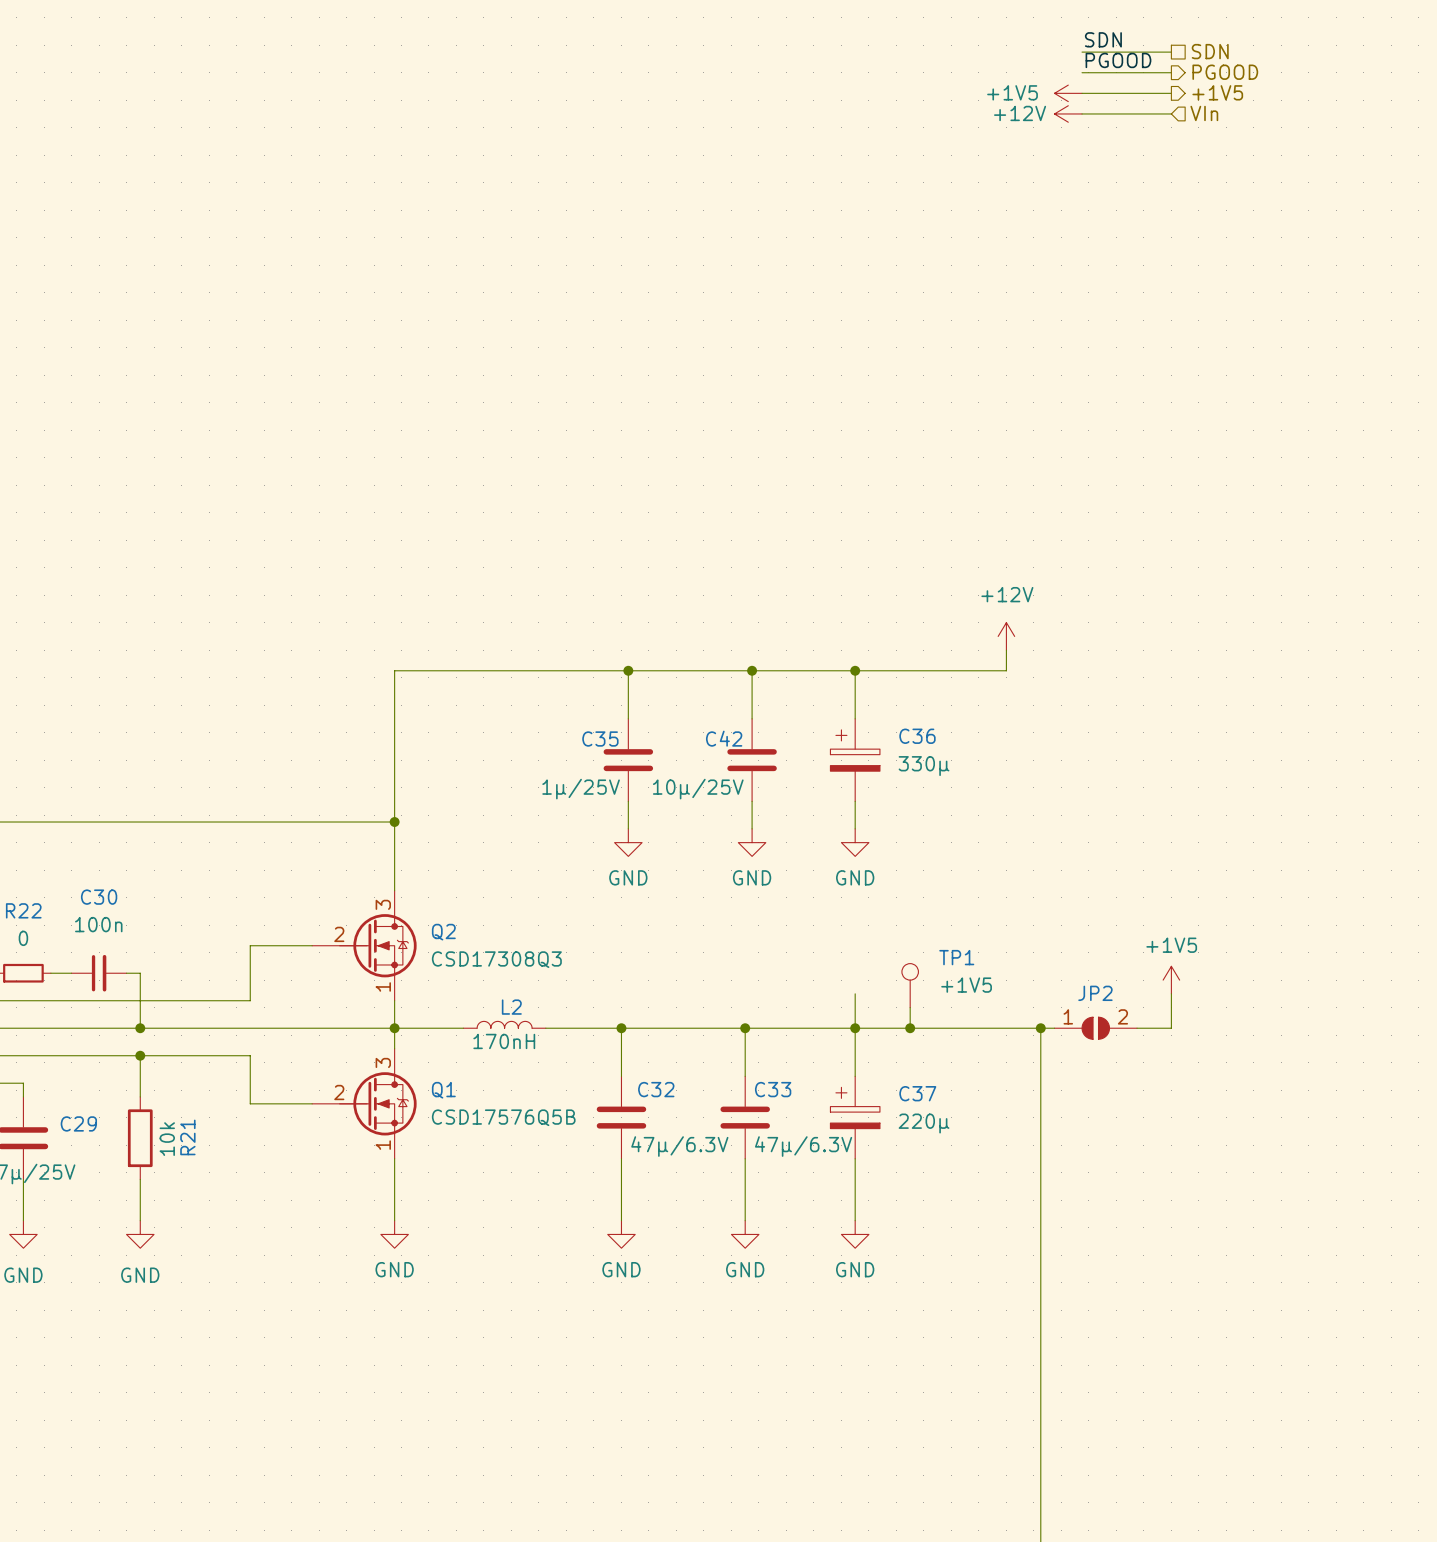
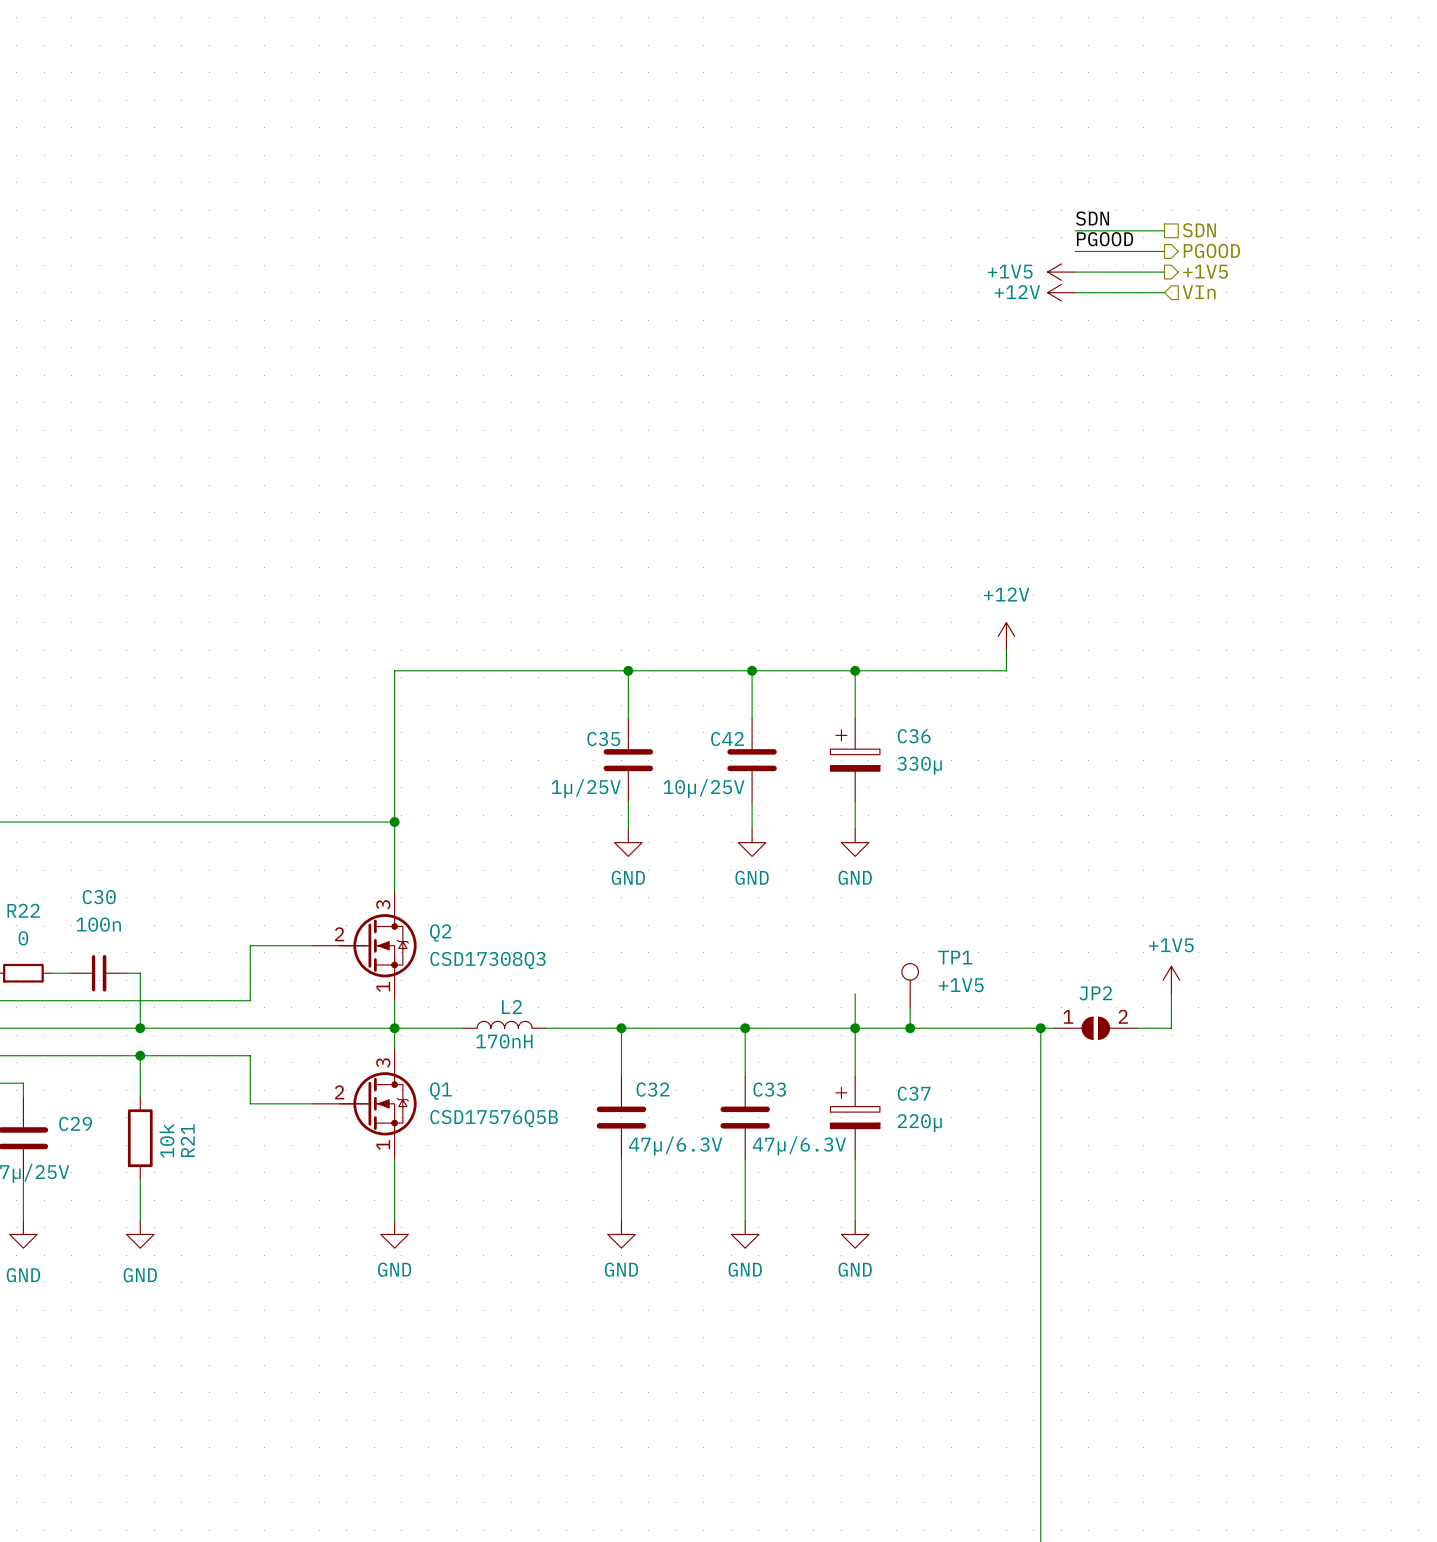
label position: SDN (1103, 39) -> SDN (1092, 218)
hierarchical label position: SDN (1210, 51) -> SDN (1199, 230)
wire: (1082, 52) (1171, 52) -> (1075, 292) (1164, 292)
label position: PGOOD (1118, 60) -> PGOOD (1105, 239)
wire: (1082, 72) (1171, 72) -> (1075, 272) (1164, 272)
hierarchical label position: PGOOD (1225, 72) -> PGOOD (1211, 250)
hierarchical label position: +1V5 (1217, 92) -> +1V5 (1205, 271)
power symbol position: +1V5 (1068, 93) -> +1V5 (1061, 272)
wire: (1082, 93) (1171, 93) -> (1075, 251) (1164, 251)
power symbol position: +12V (1068, 113) -> +12V (1061, 292)
wire: (1082, 113) (1171, 113) -> (1075, 230) (1164, 230)
hierarchical label position: VIn (1204, 113) -> VIn (1199, 292)

